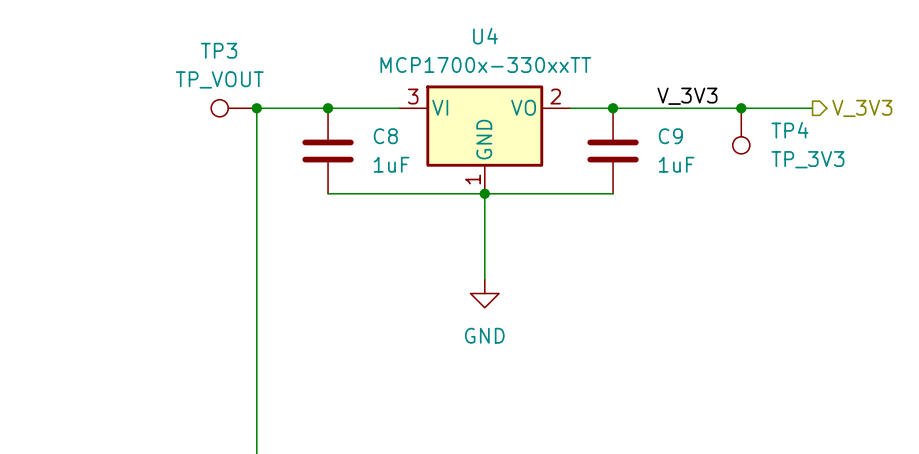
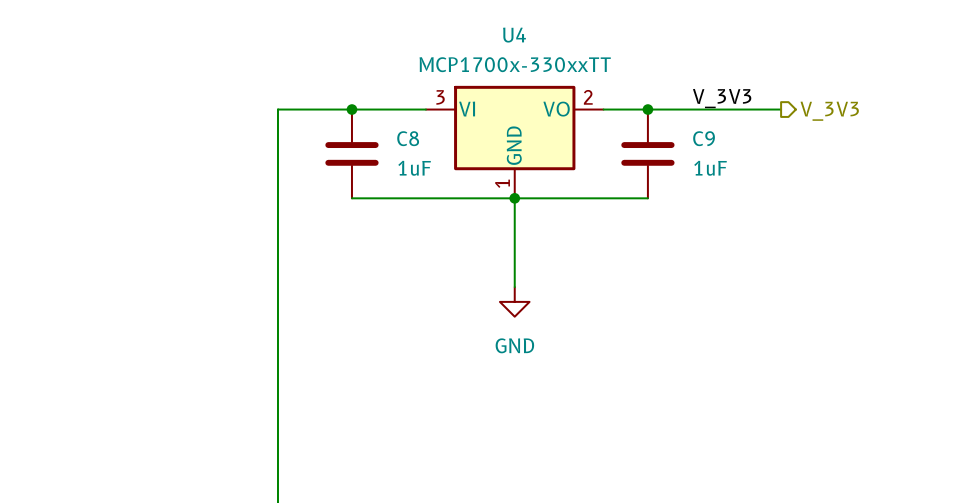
TP3: TP_VOUT (233, 108) -> none
junction: (256, 108) -> none
wire: (741, 108) (812, 108) -> none
junction: (741, 108) -> none
hierarchical label position: V_3V3 (862, 108) -> V_3V3 (829, 111)
TP4: TP_3V3 (741, 131) -> none

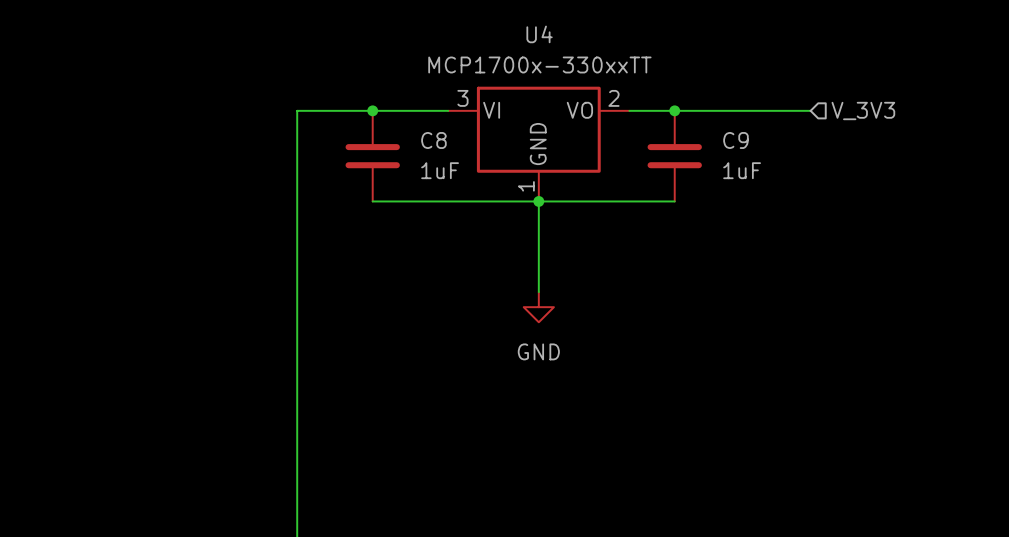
label: V_3V3 (722, 98) -> none
hierarchical label shape: output (829, 111) -> input (863, 111)

